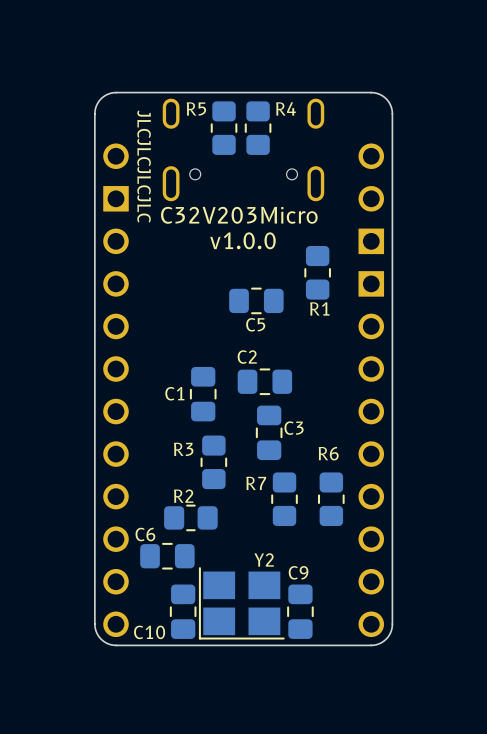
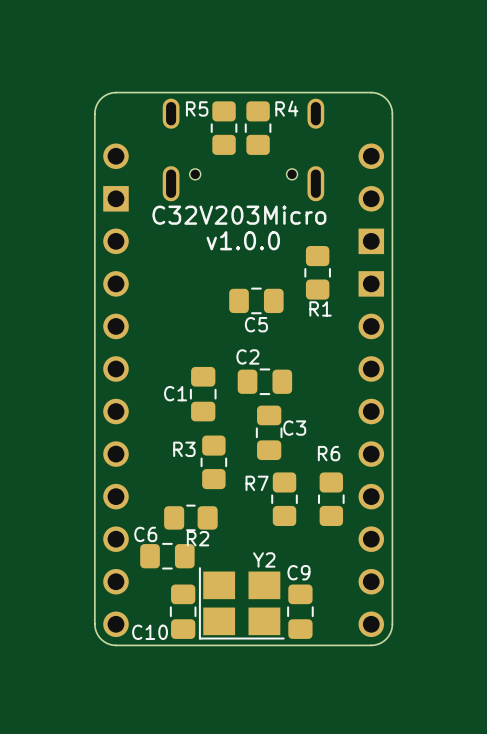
drawing: [137, 110, 151, 223] -> none
R2 name position: R2 (183, 496) -> R2 (198, 538)

